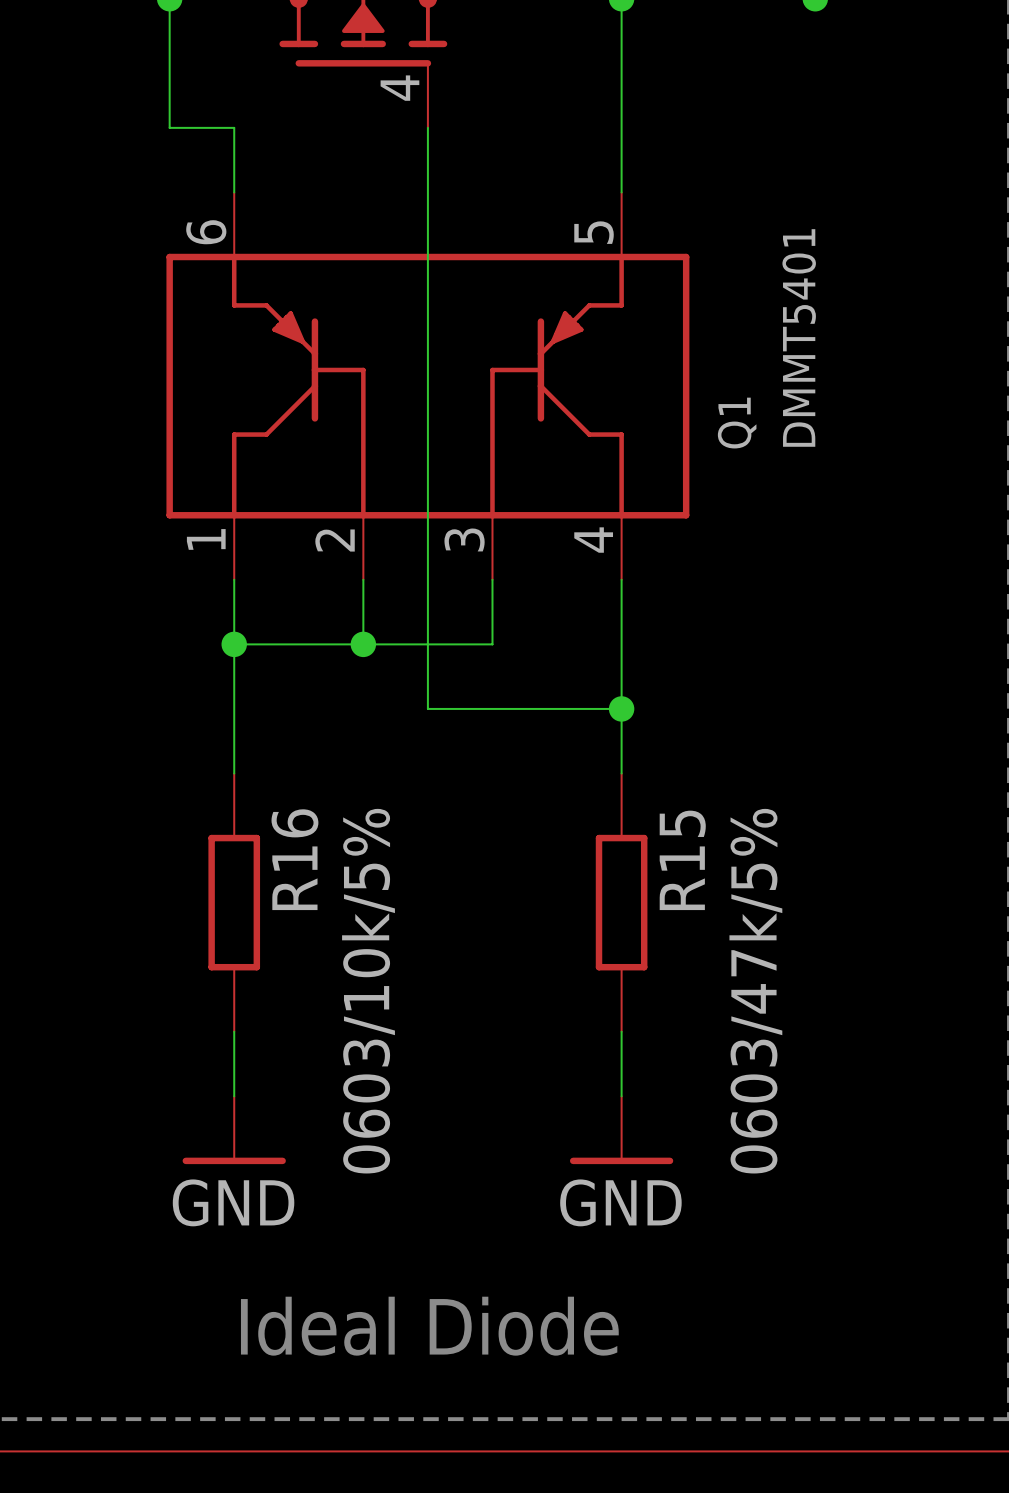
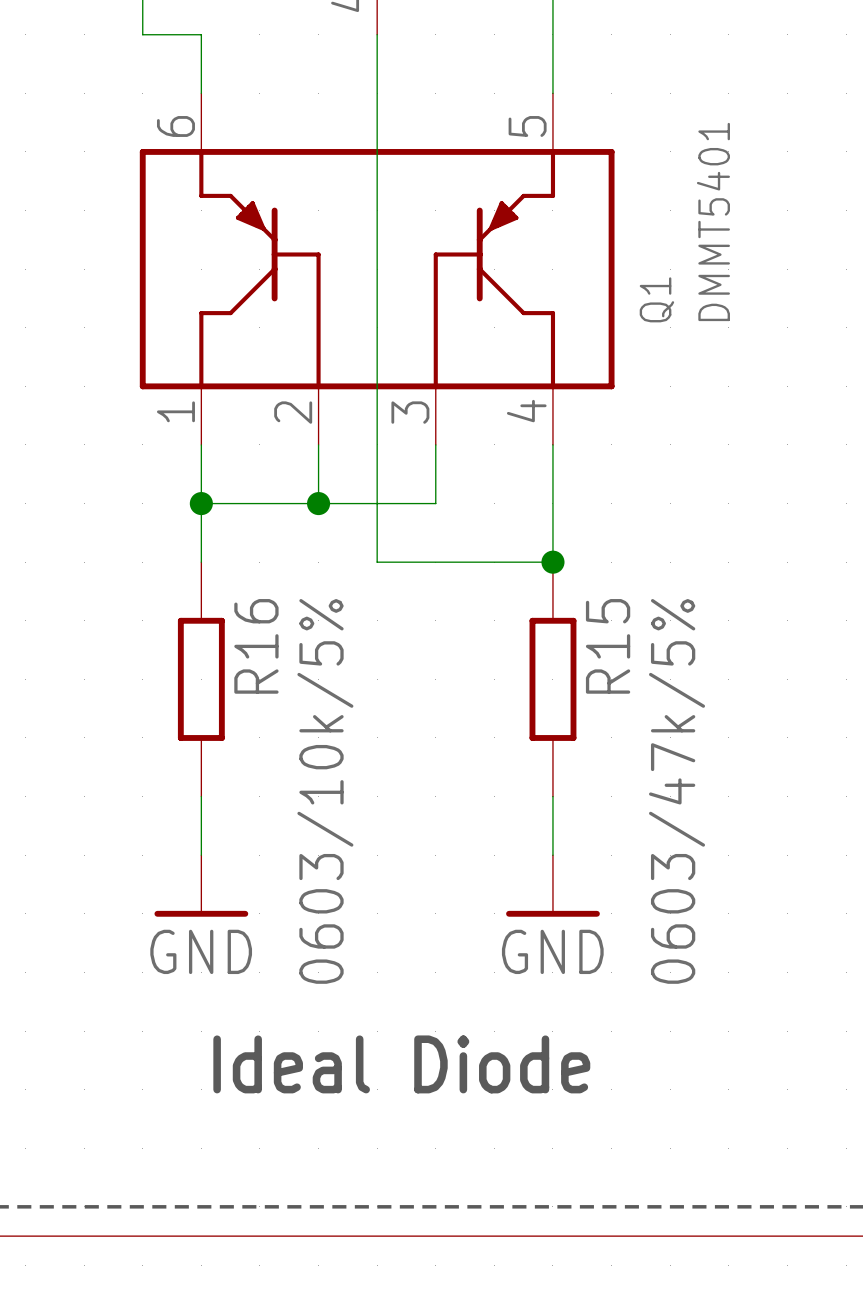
R16 position: (234, 902) -> (201, 679)
R15 position: (621, 902) -> (552, 679)
power symbol position: GND (234, 1130) -> GND (201, 885)
power symbol position: GND (621, 1130) -> GND (552, 885)
text position: Ideal Diode (429, 1326) -> Ideal Diode (401, 1064)

